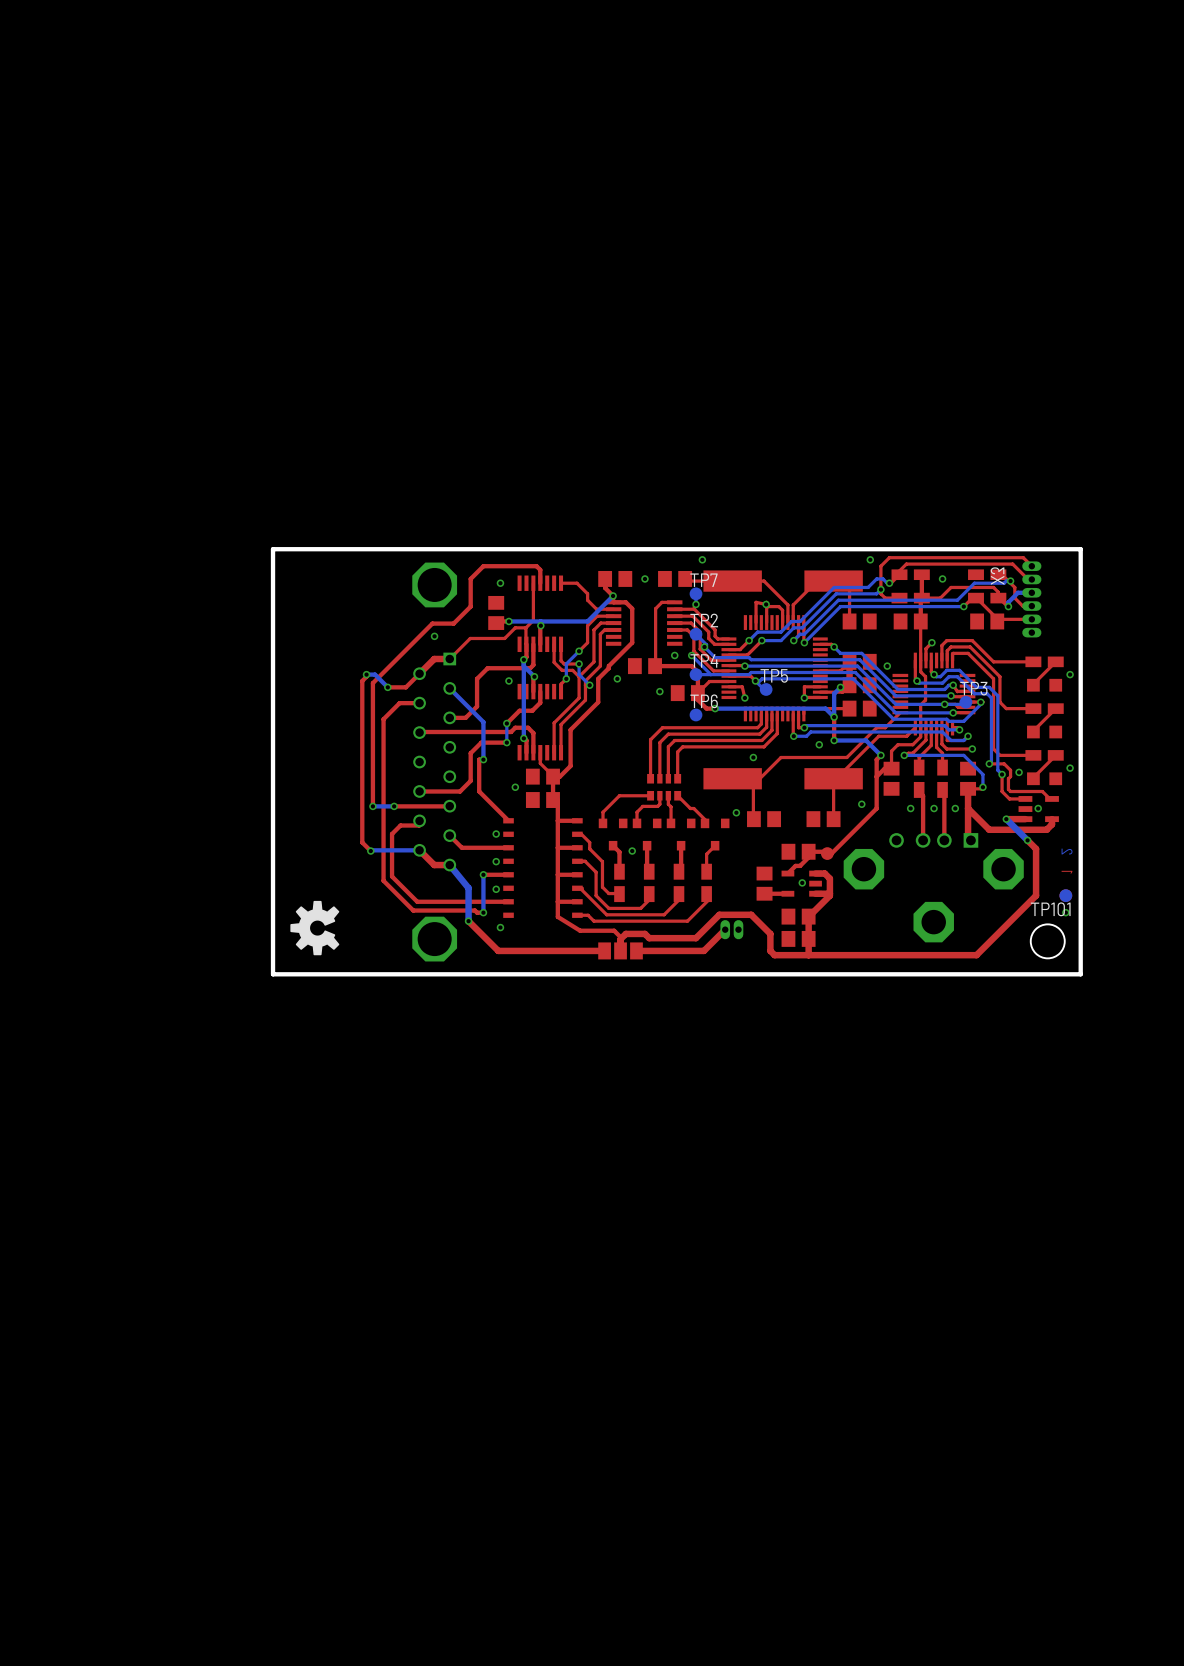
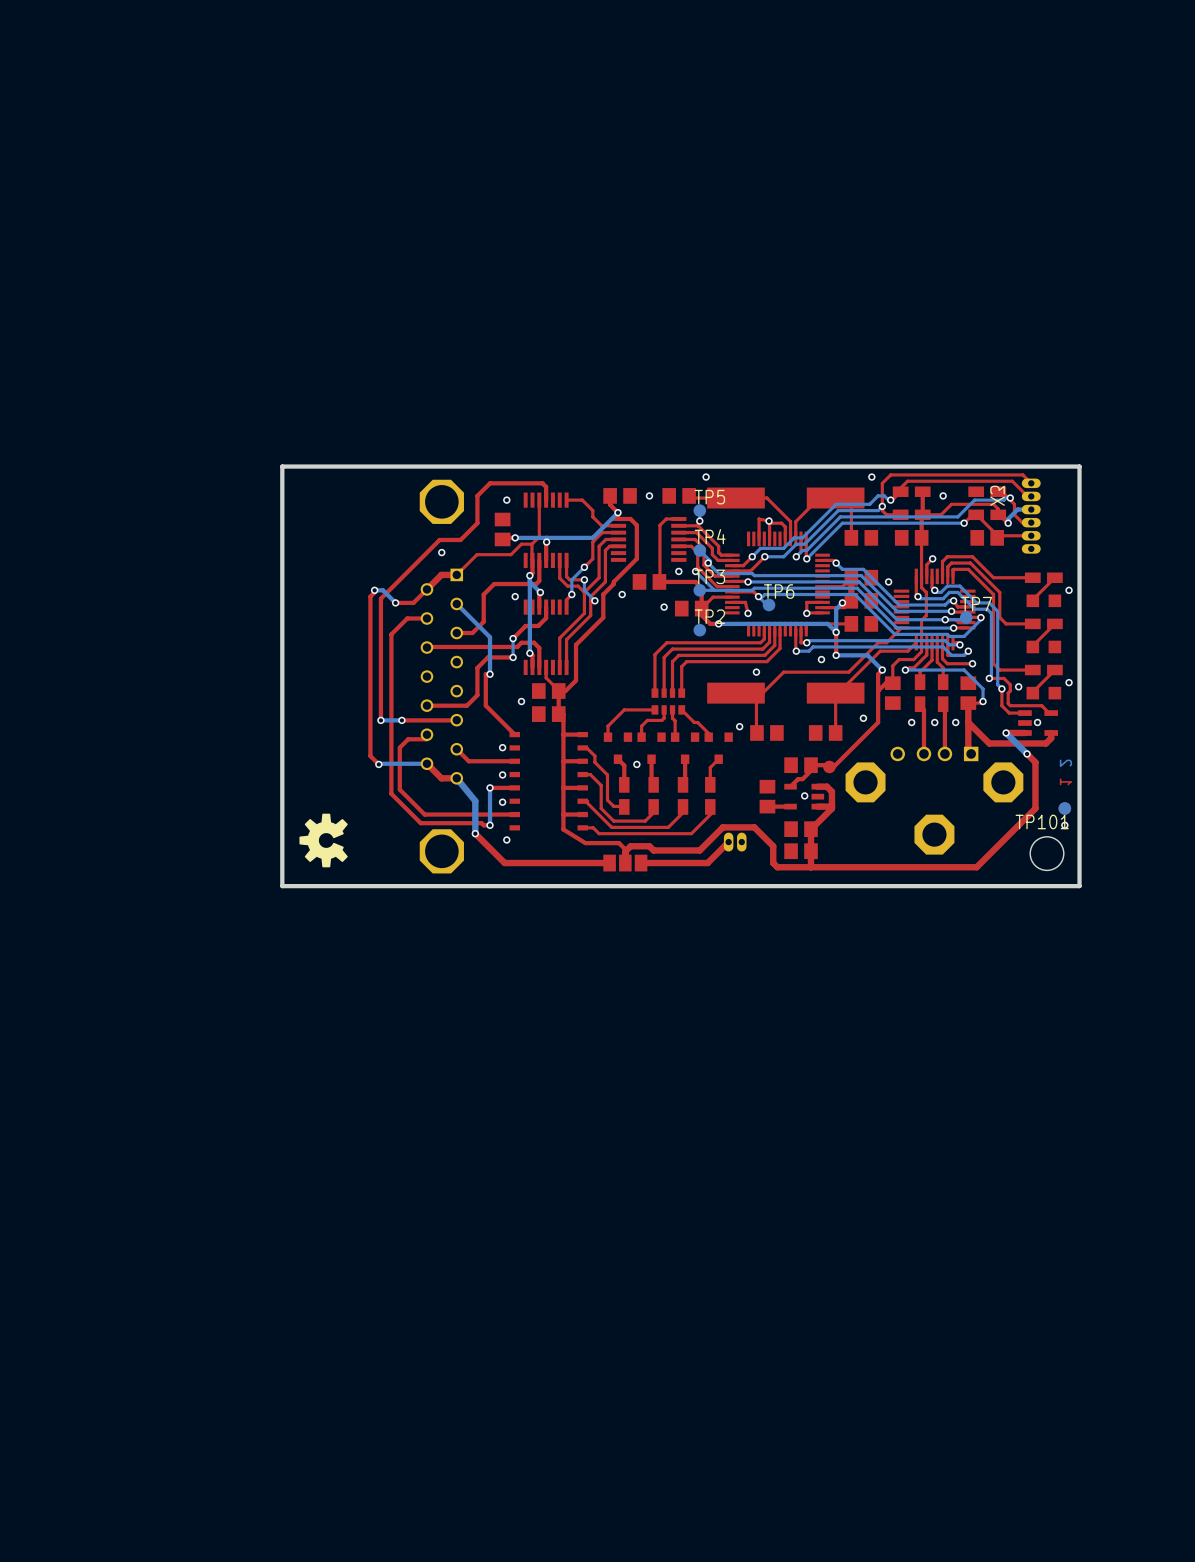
TP7 name: TP7 (703, 580) -> TP5 (709, 497)
TP2 name: TP2 (704, 620) -> TP4 (710, 536)
TP4 name: TP4 (704, 660) -> TP3 (709, 576)
TP5 name: TP5 (774, 675) -> TP6 (779, 591)
TP3 name: TP3 (973, 688) -> TP7 (976, 604)
TP6 name: TP6 (704, 701) -> TP2 (709, 616)

